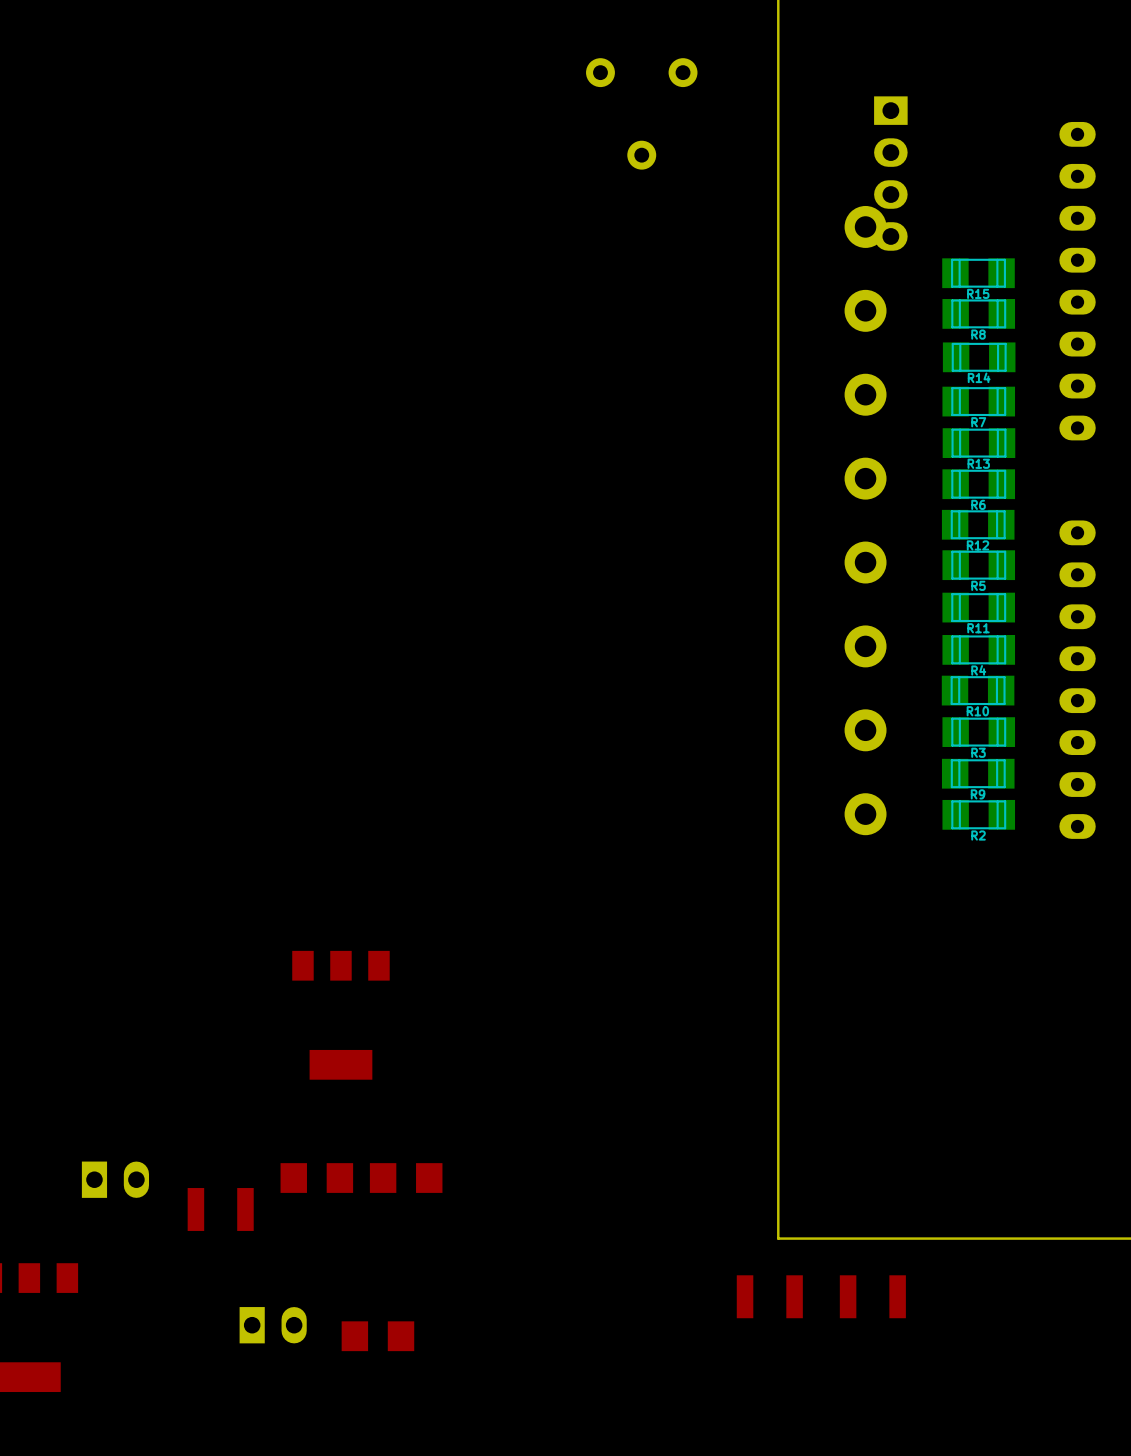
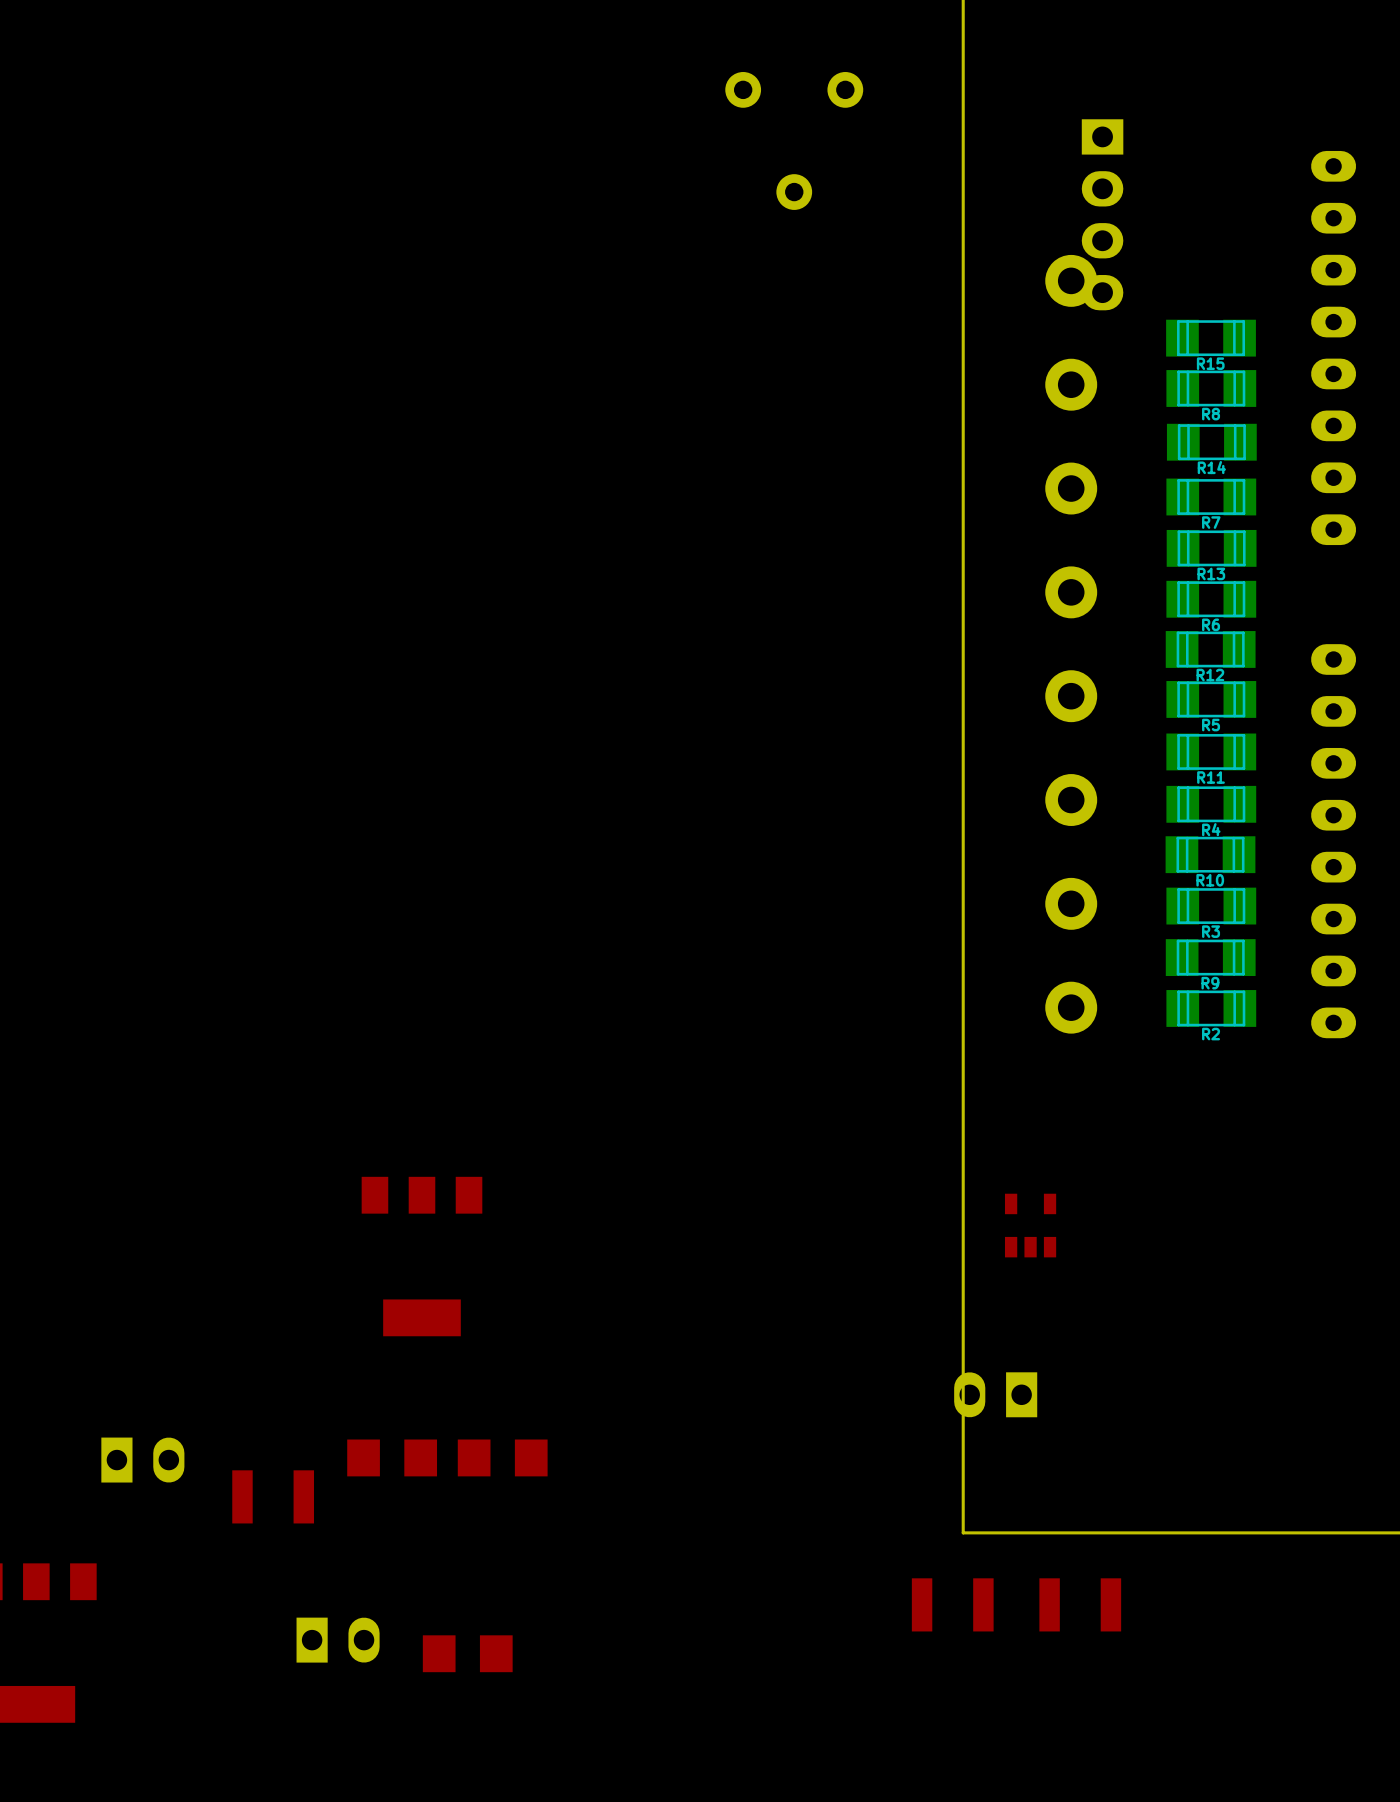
part: none -> (1030, 1225)
part: none -> (995, 1394)

